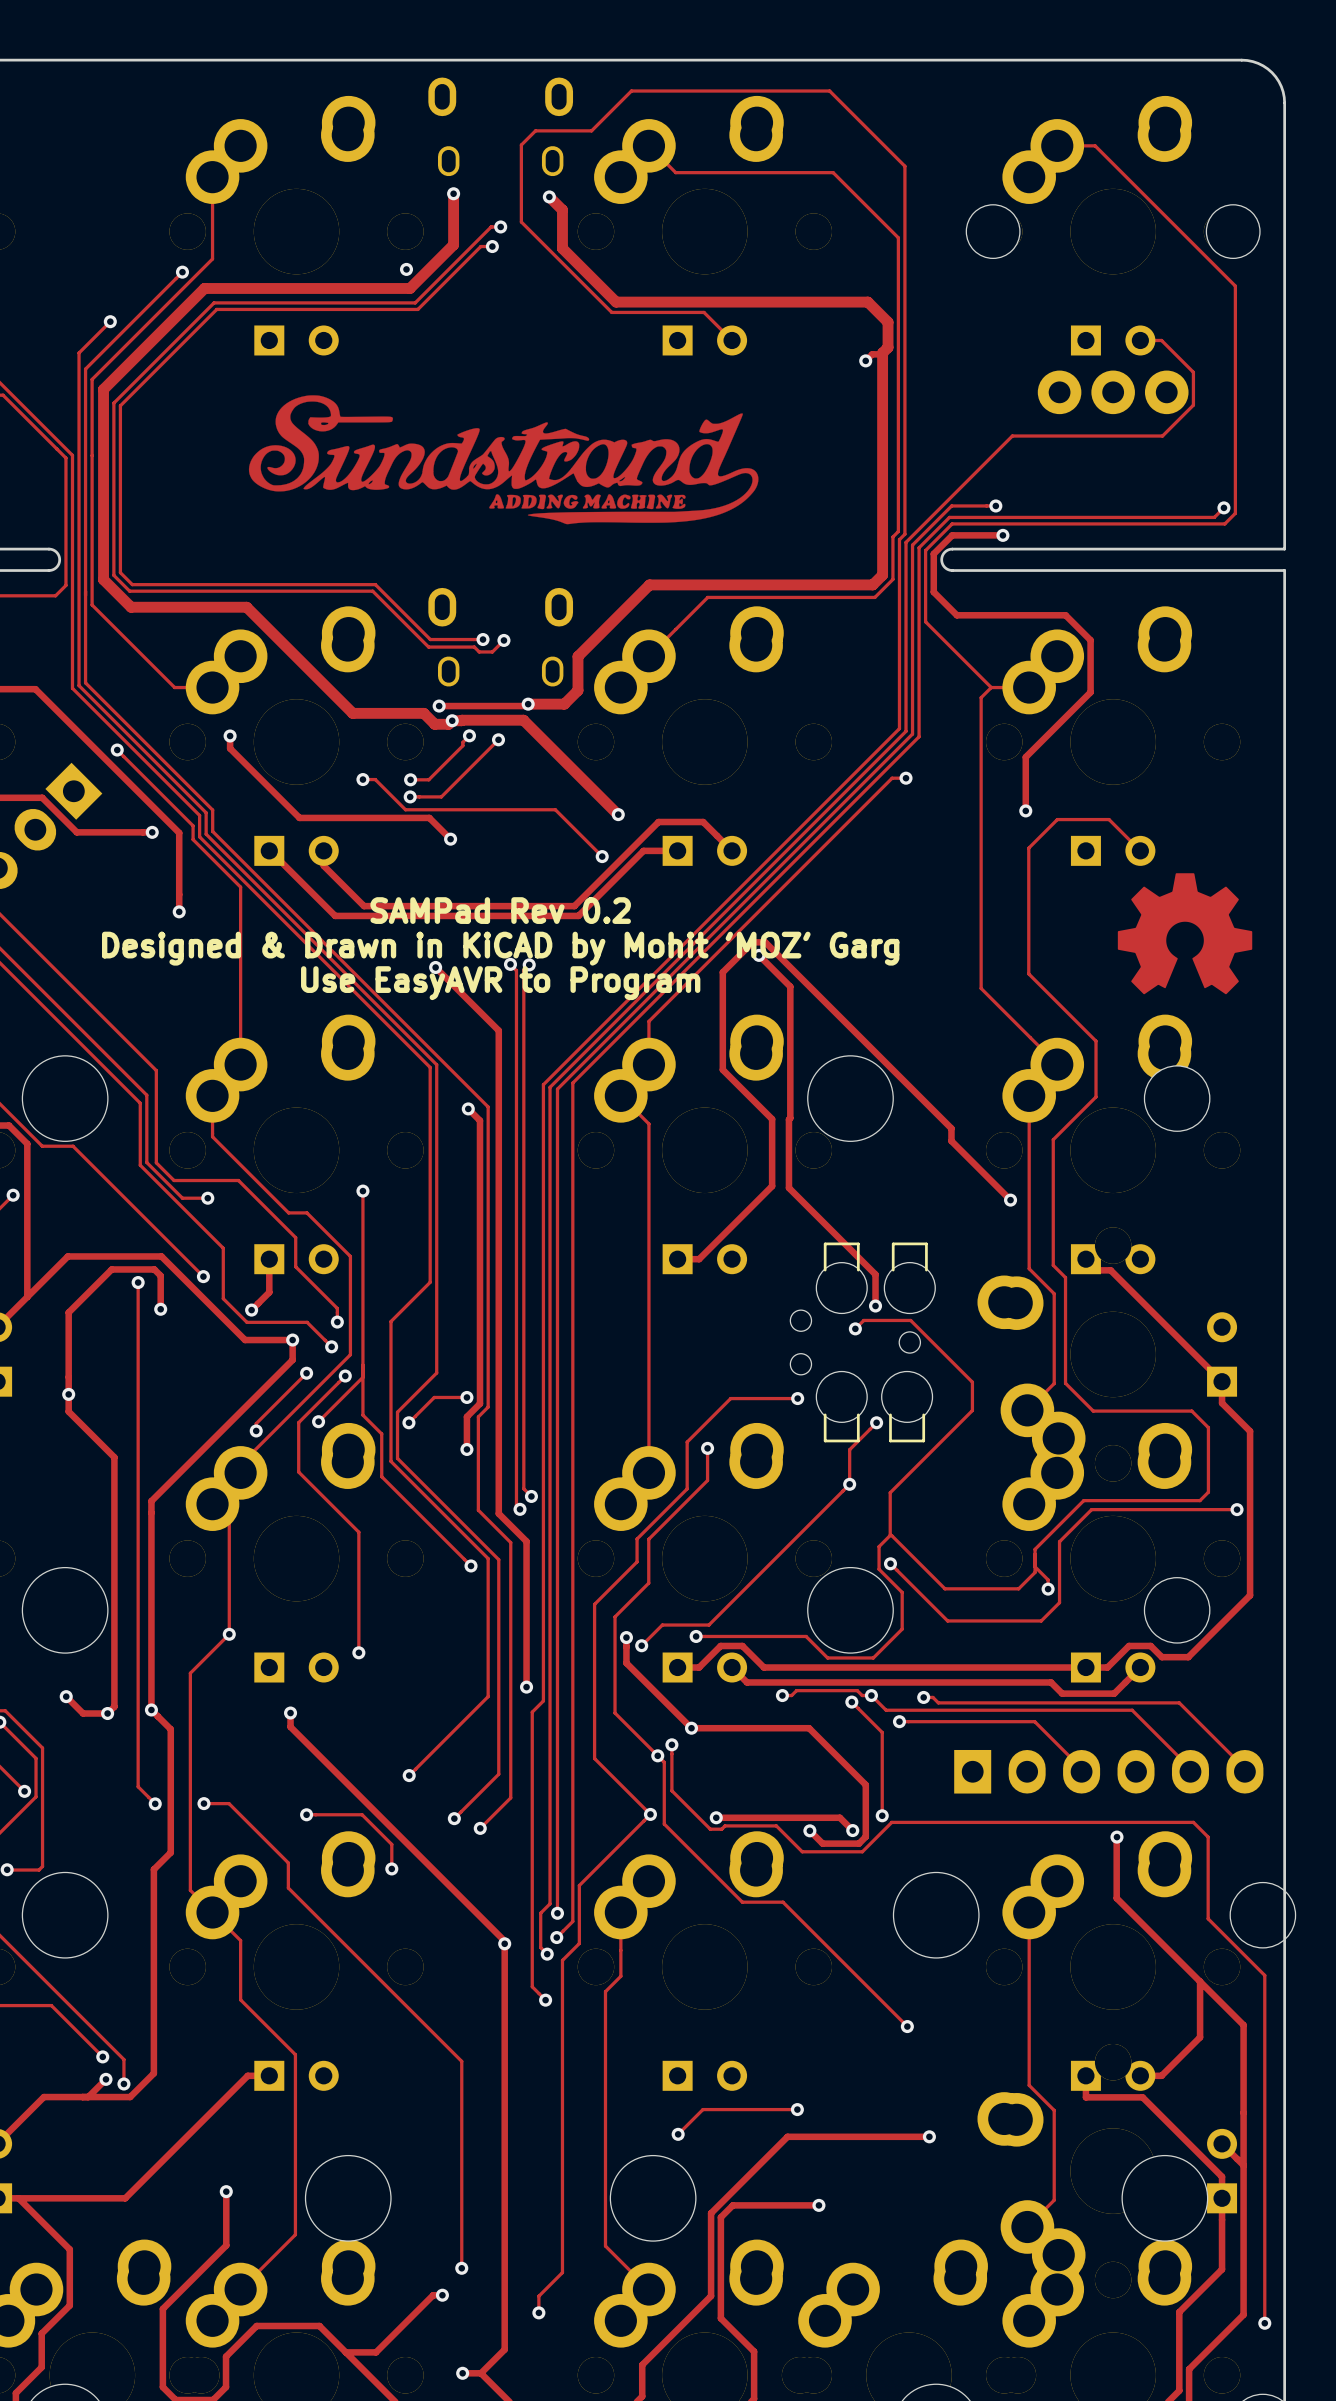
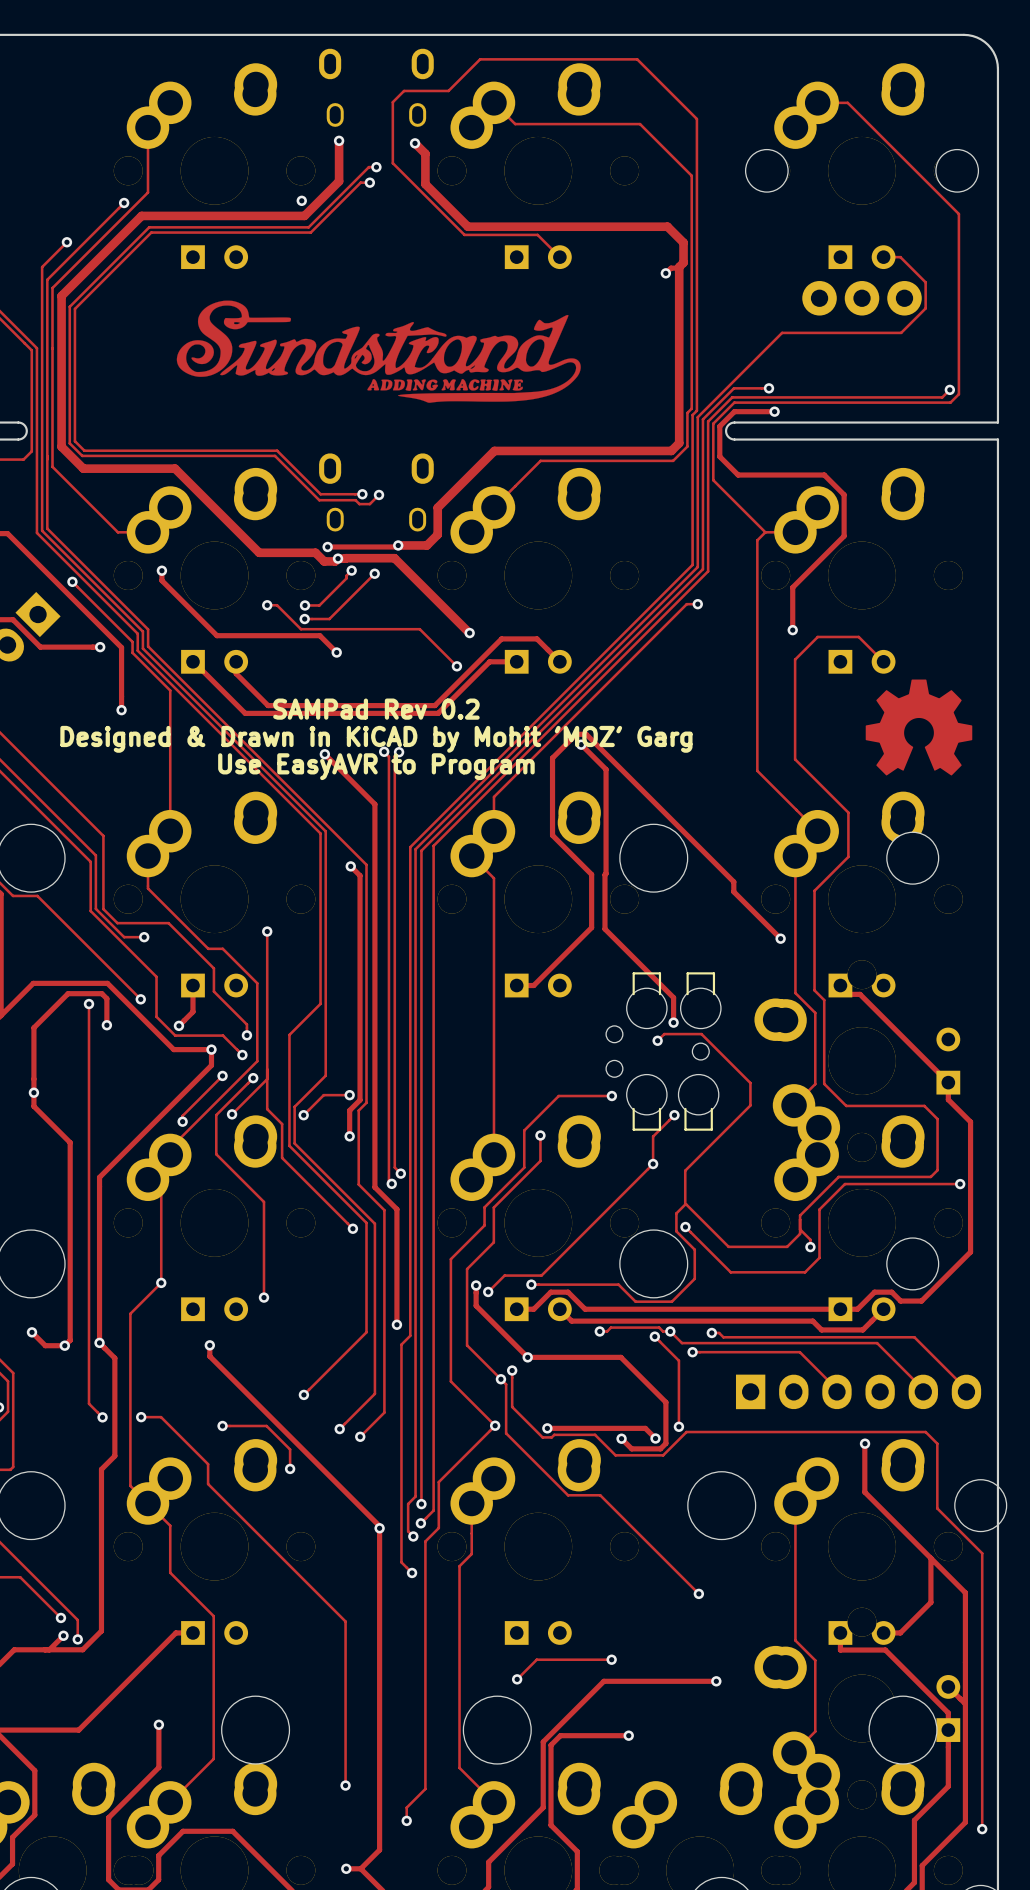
track: (442, 2295) (433, 2295) (376, 2352) (345, 2352) -> none
via: (442, 2295) -> none

